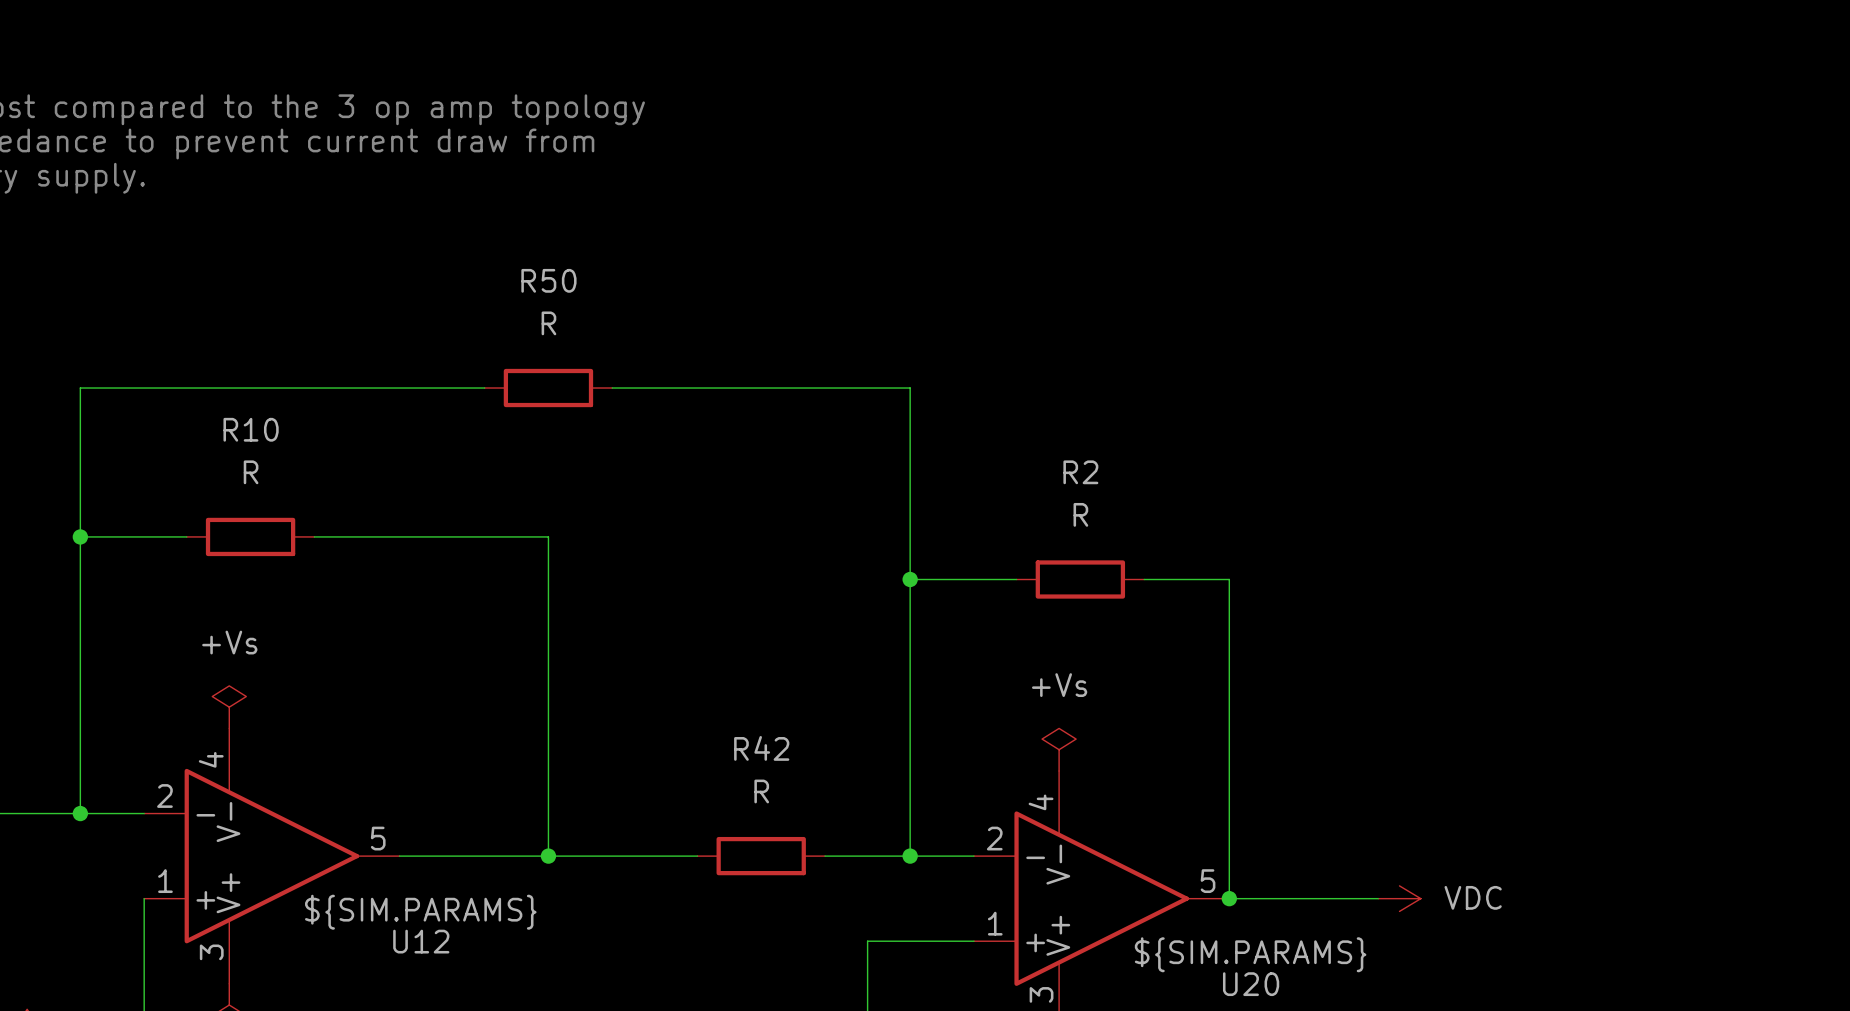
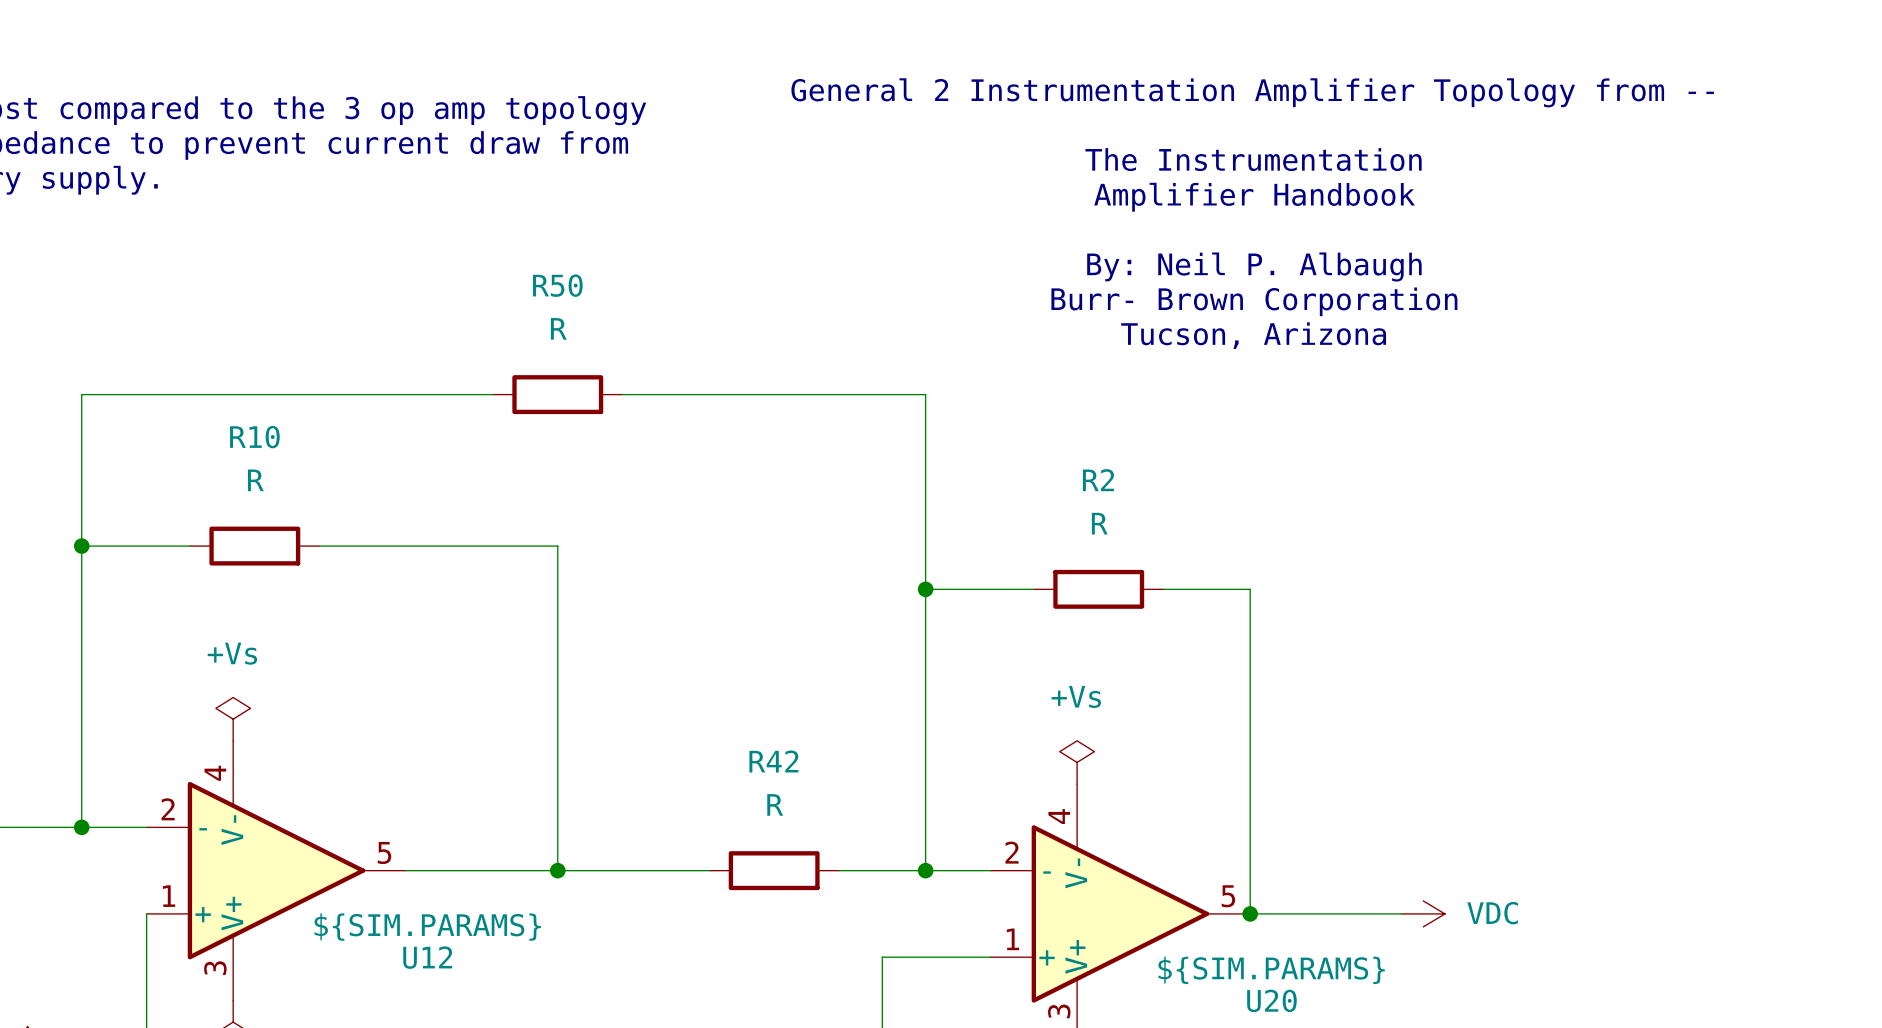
text: none -> General 2 Instrumentation Amplifier Topology from -- (1252, 92)
text: none -> The Instrumentation (1253, 159)
text: none -> Amplifier Handbook (1254, 197)
text: none -> By: Neil P. Albaugh (1254, 267)
text: none -> Burr- Brown Corporation (1254, 301)
text: none -> Tucson, Arizona (1253, 335)

